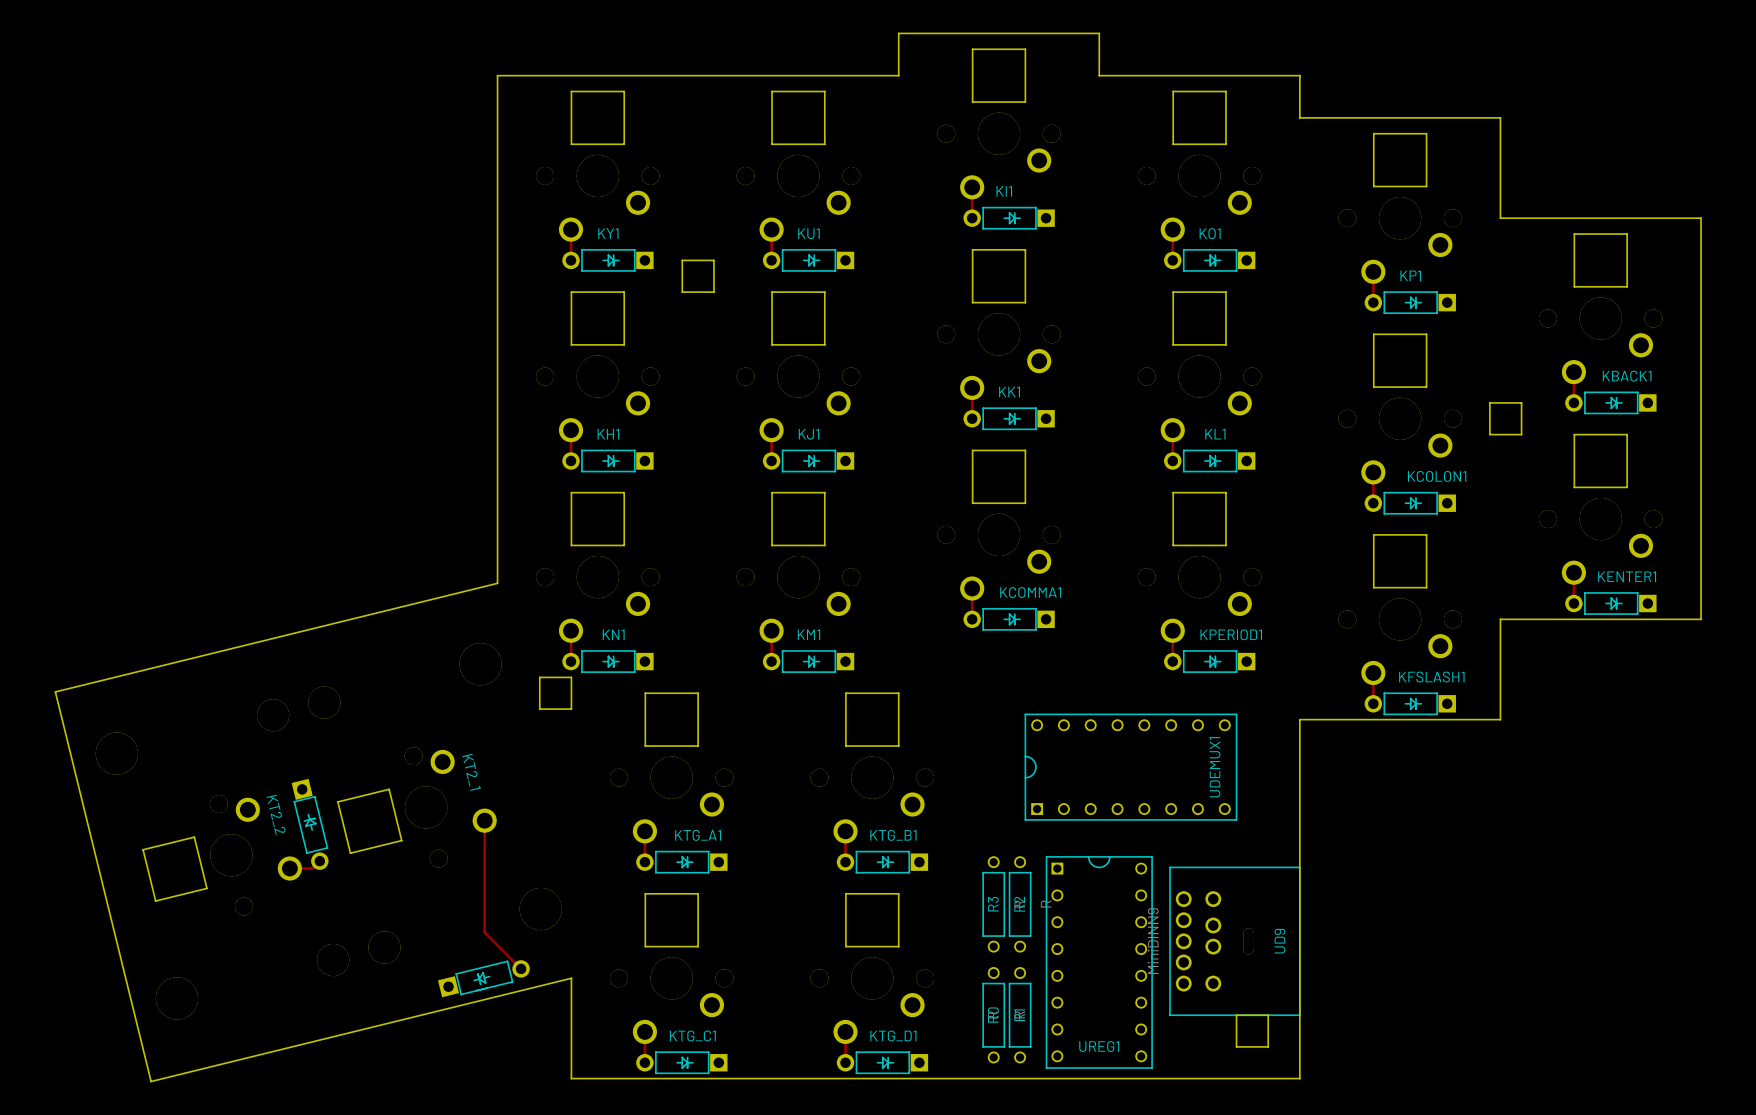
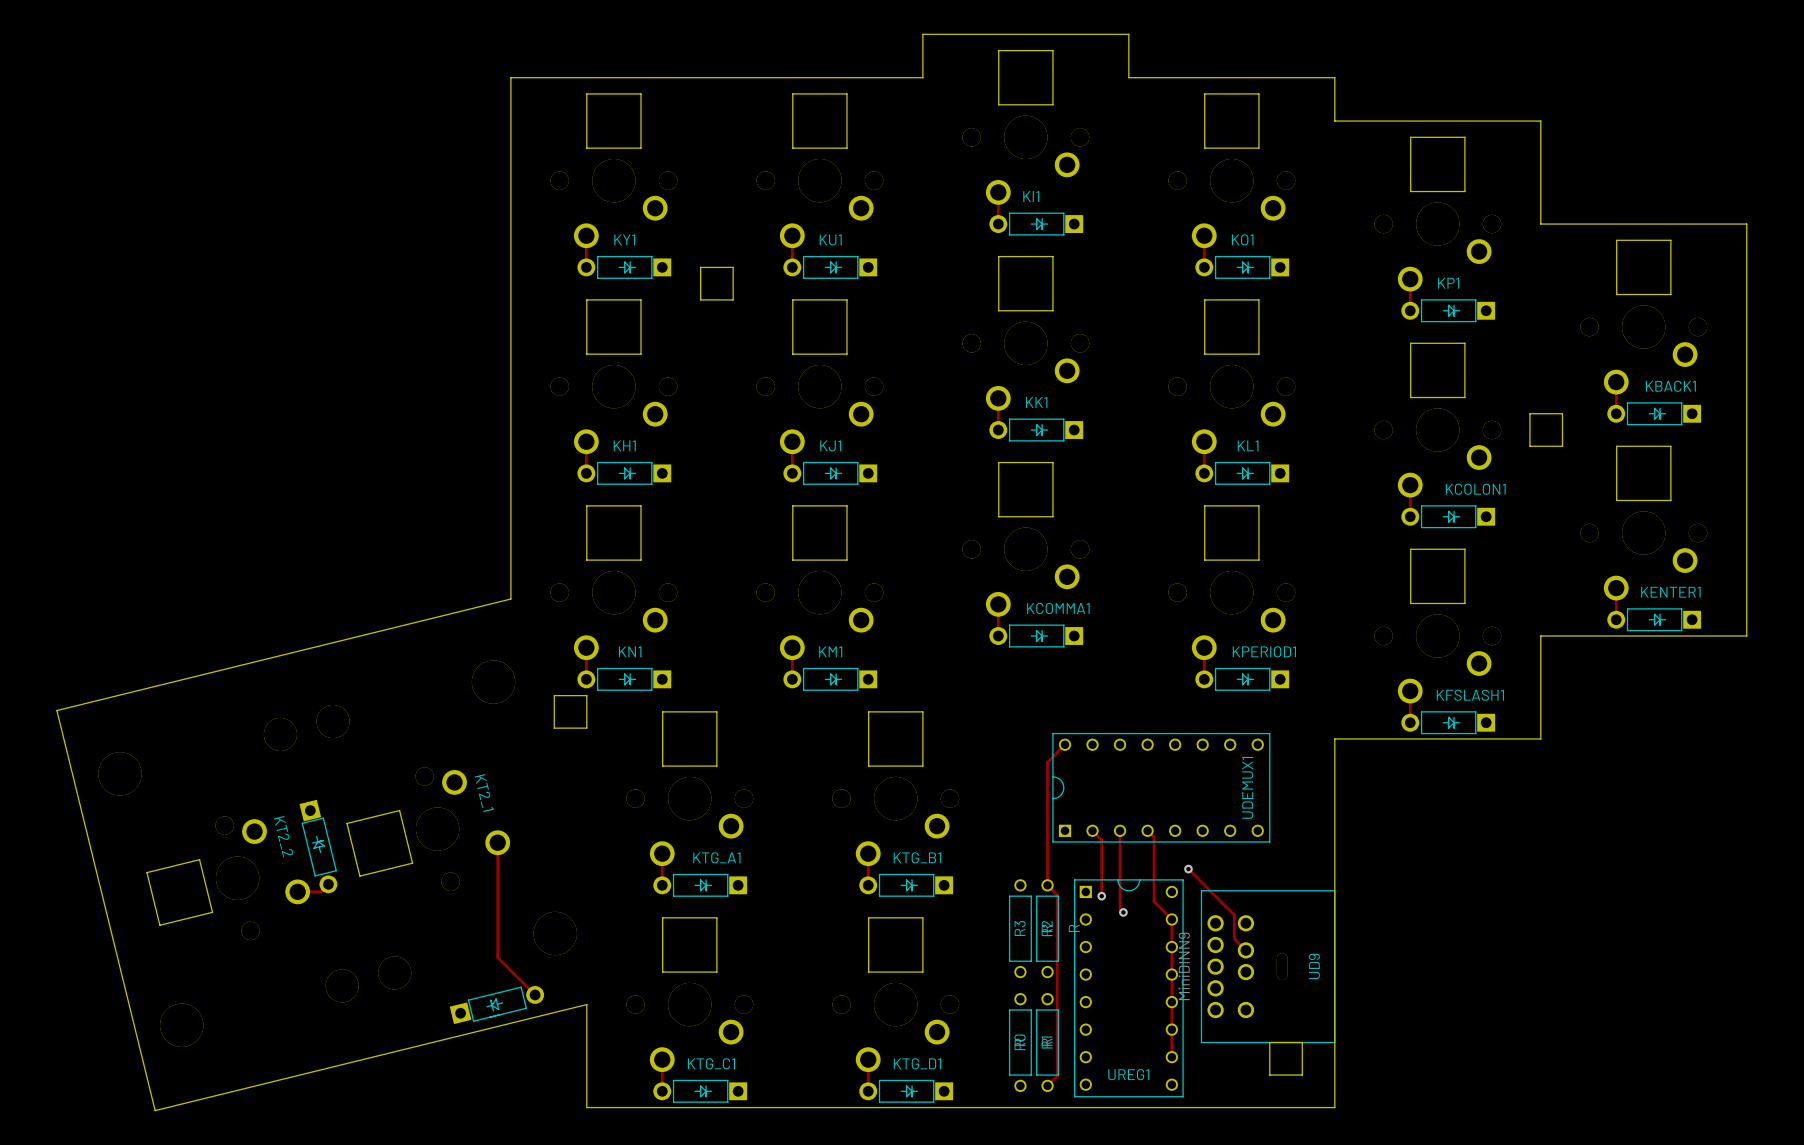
track: none -> (1064, 744) (1047, 762) (1047, 885) (1057, 894) (1057, 1076) (1047, 1085)
track: none -> (1092, 830) (1101, 840) (1101, 896)
track: none -> (1120, 830) (1120, 909) (1123, 912)
track: none -> (1147, 830) (1153, 837) (1153, 901) (1171, 919) (1171, 1057)
track: none -> (1188, 869) (1234, 914) (1234, 938) (1245, 950)
via: none -> (1188, 869)
via: none -> (1101, 896)
via: none -> (1123, 912)

